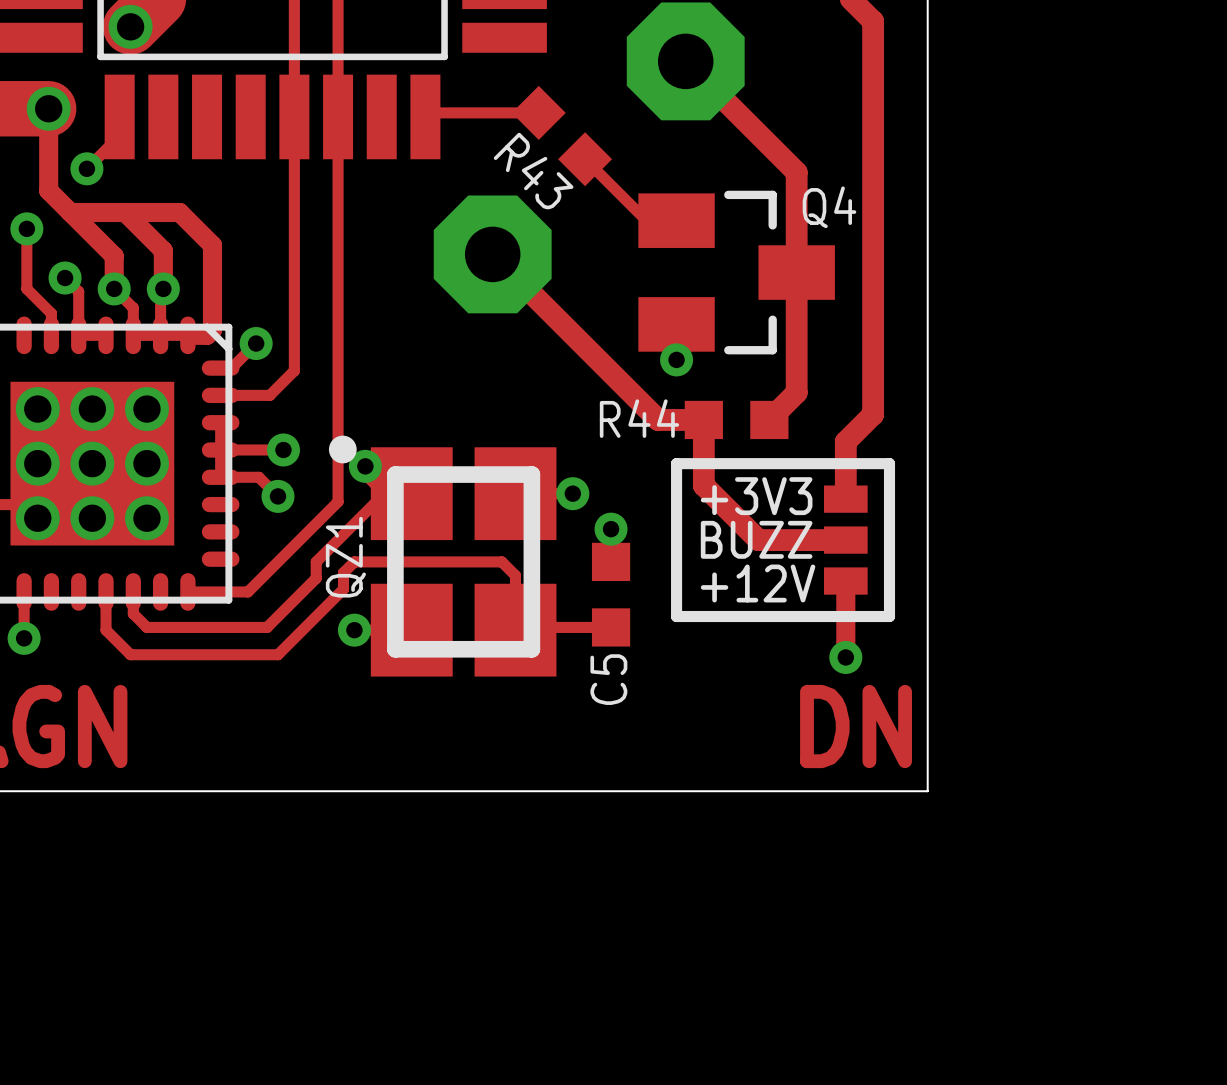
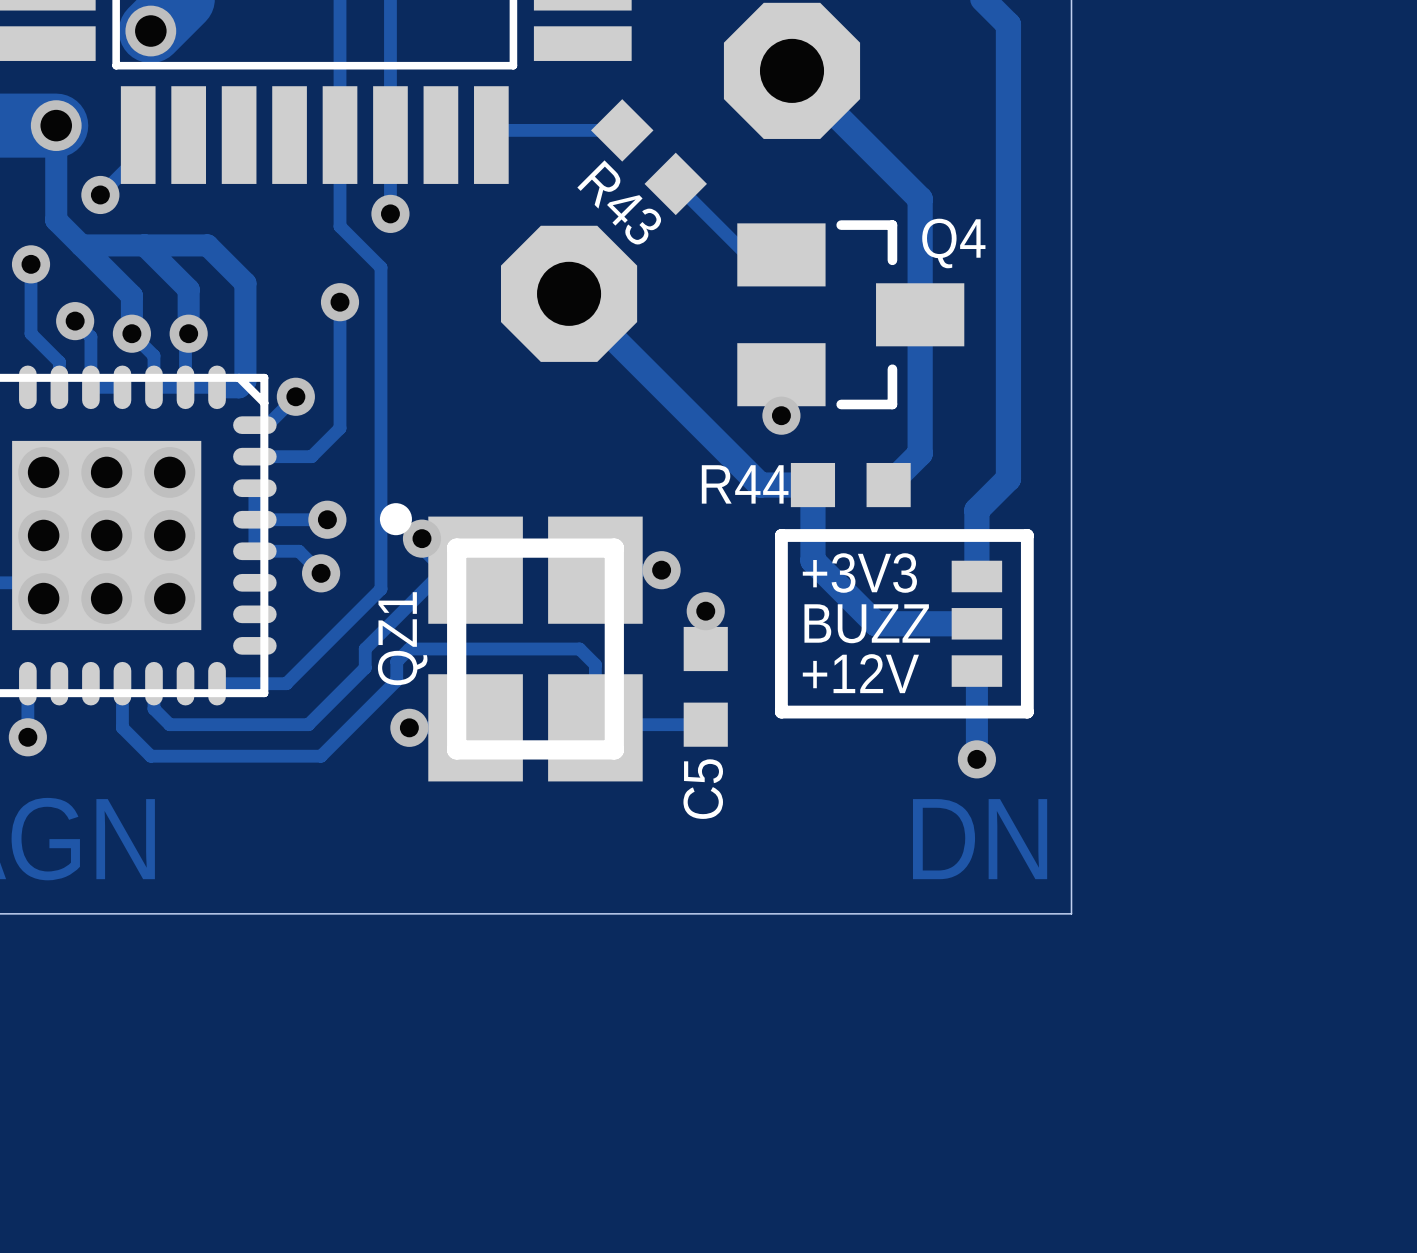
track: (338, 185) (338, 501) (329, 510) -> (340, 226) (380, 267) (380, 589)
via: none -> (390, 213)
track: (294, 196) (294, 261) -> none
via: none -> (340, 302)

